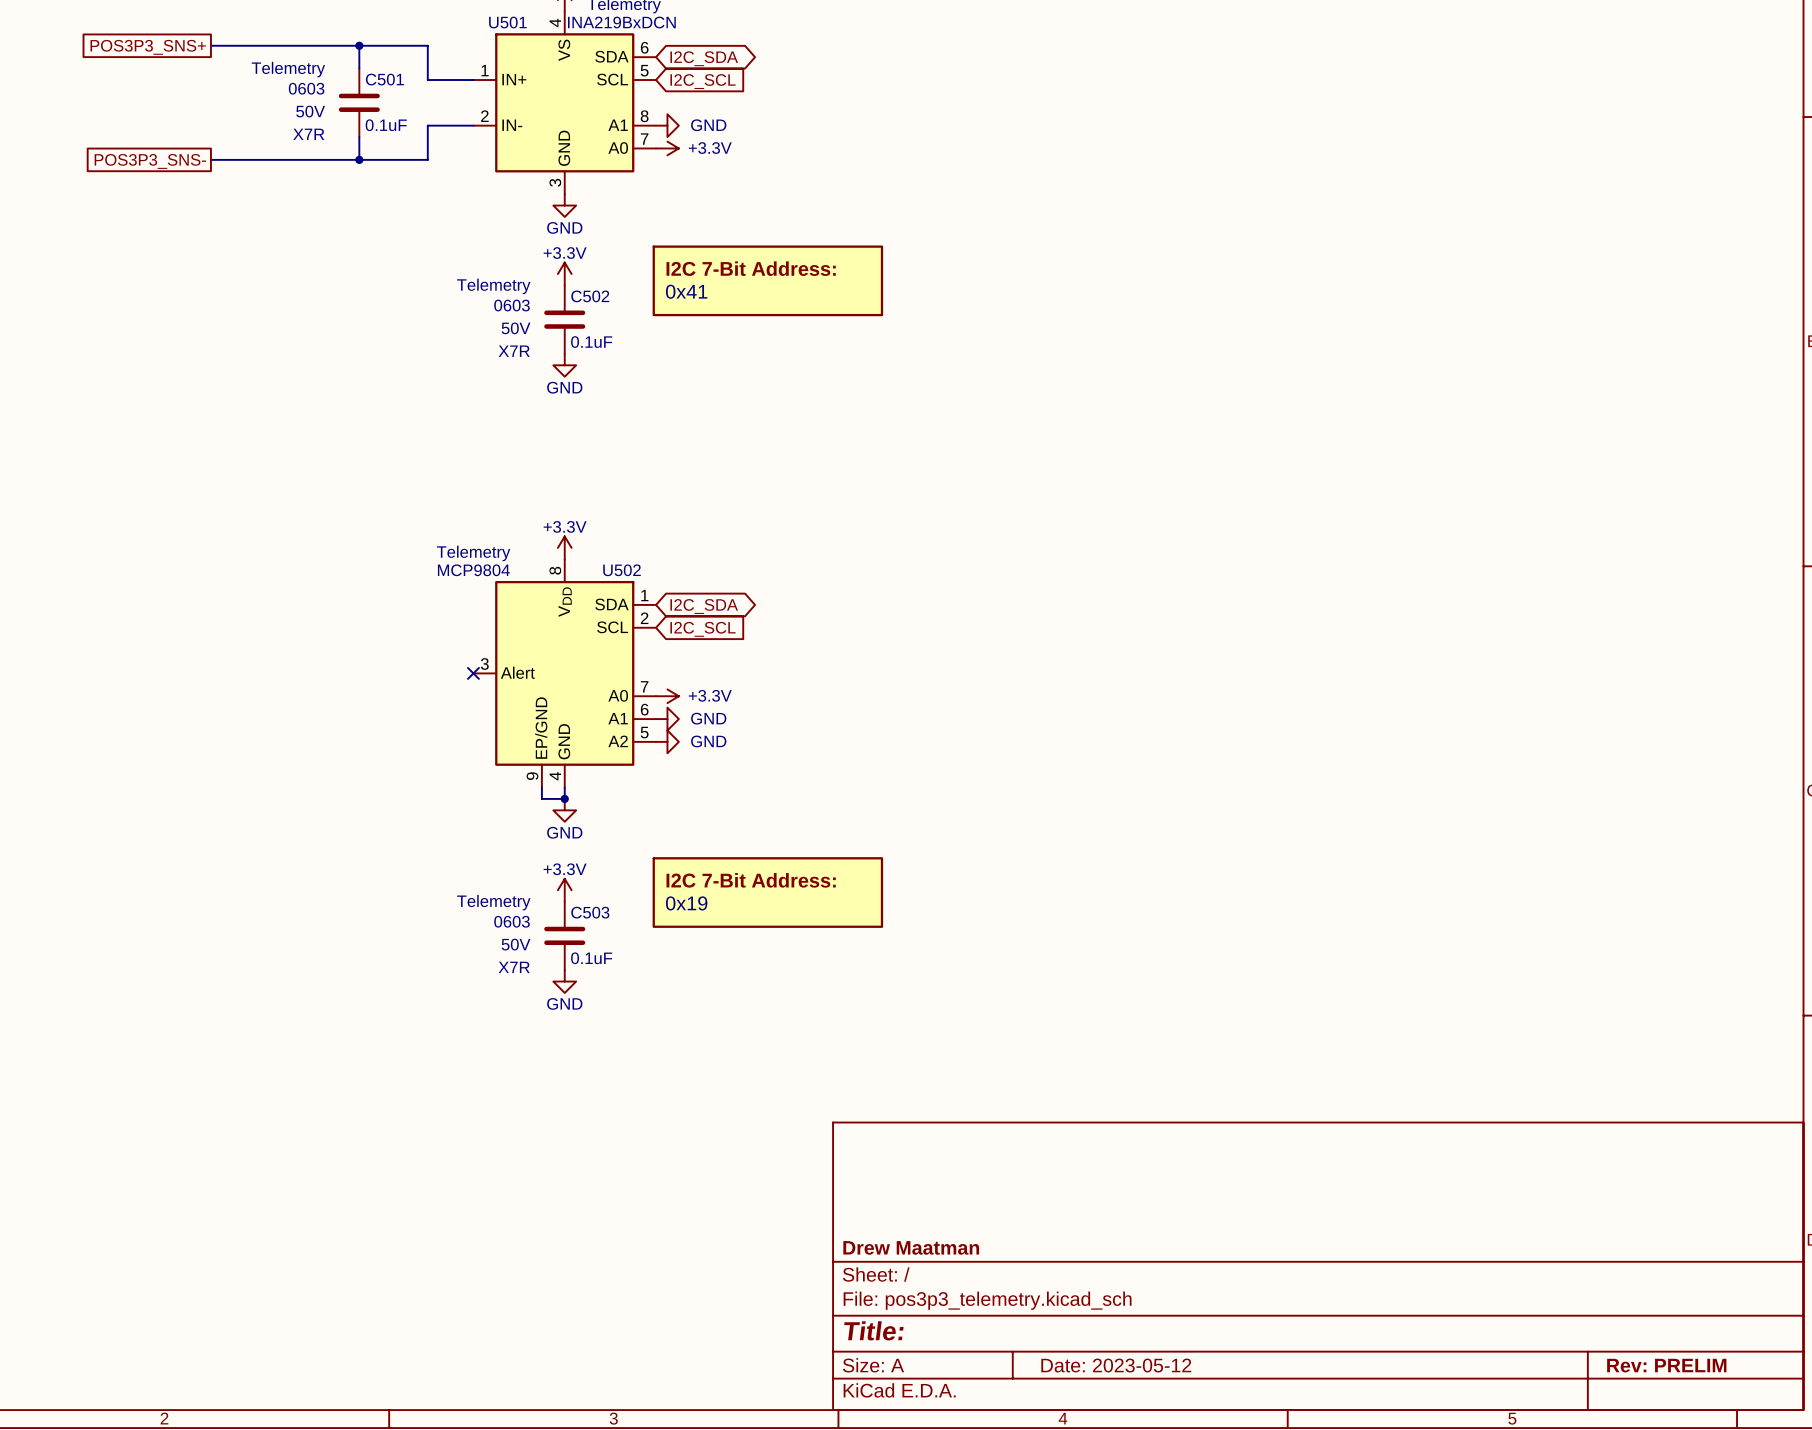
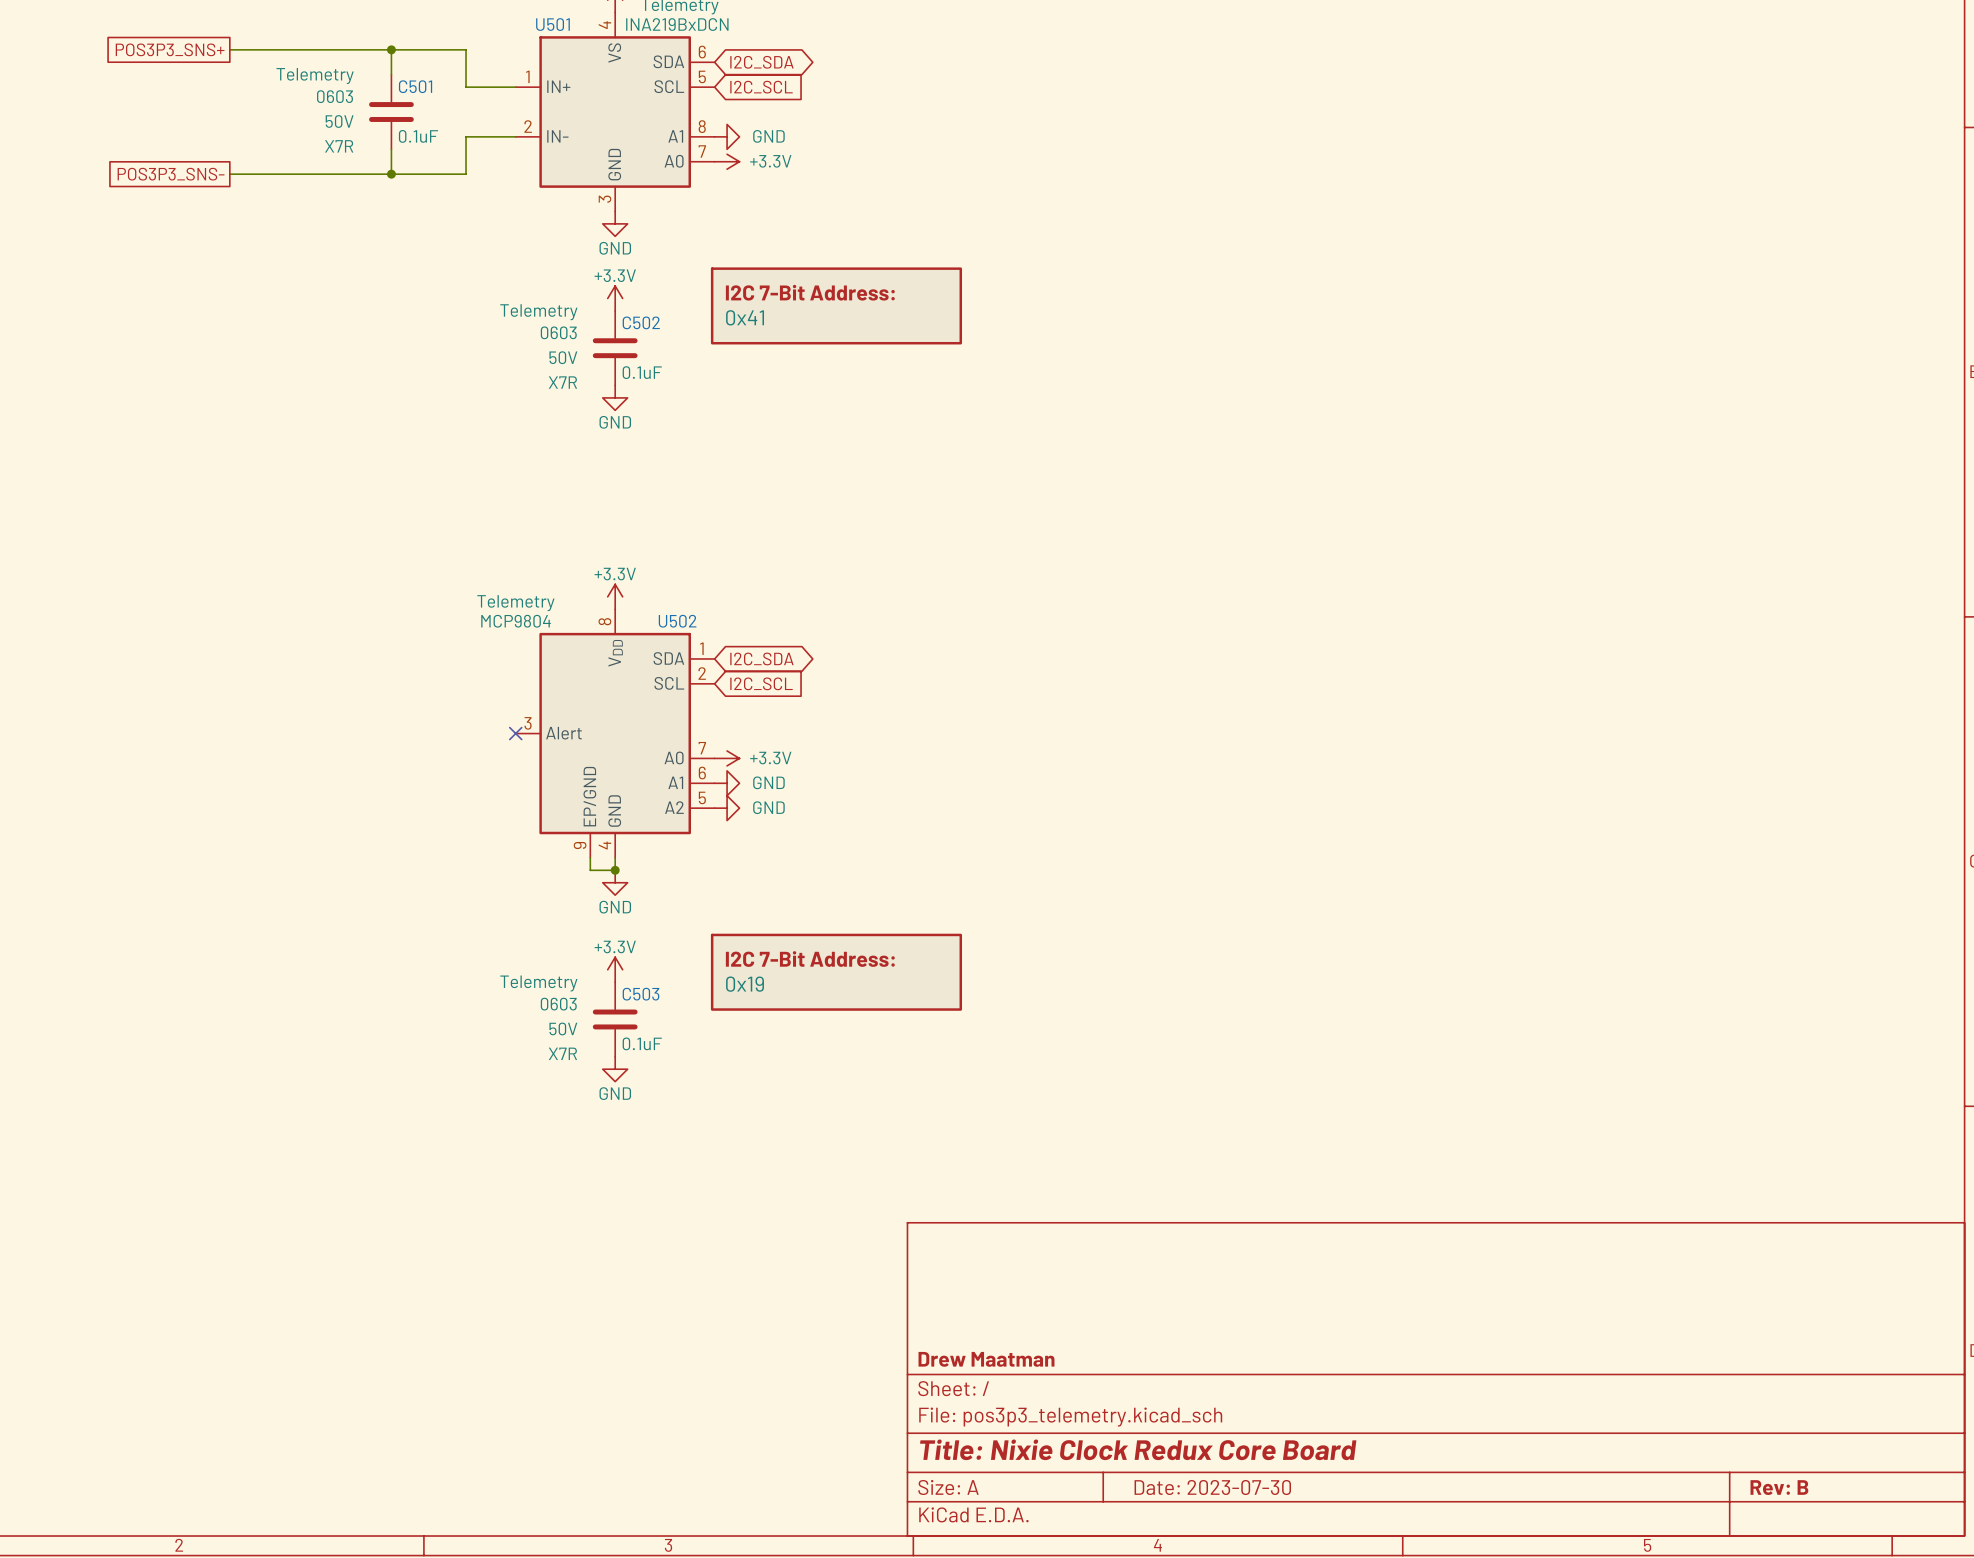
title block: Title: (873, 1330) -> Title: Nixie Clock Redux Core Board (1138, 1449)
title block: Date: 2023-05-12 (1116, 1365) -> Date: 2023-07-30 (1212, 1487)
title block: Rev: PRELIM (1666, 1365) -> Rev: B (1779, 1487)

